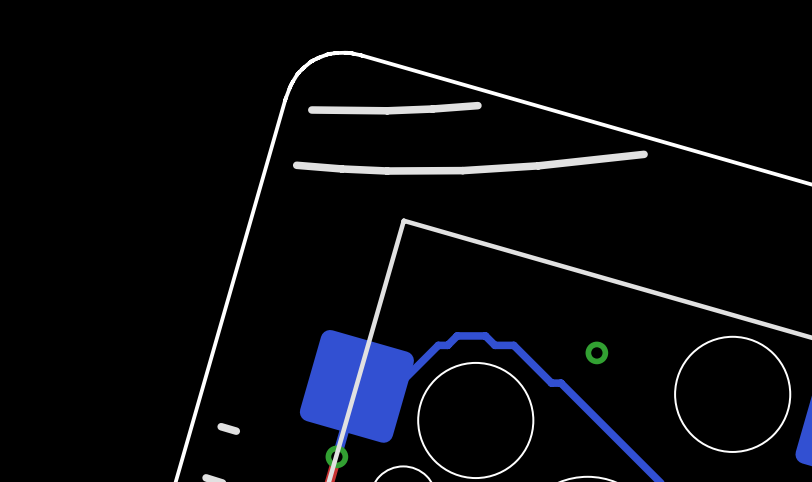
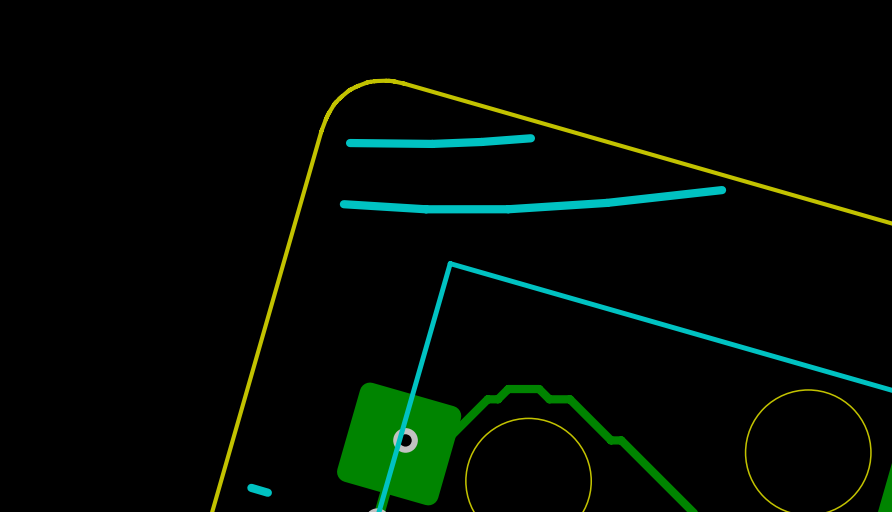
line: none -> (722, 190) (606, 202) (508, 209) (426, 209) (343, 204)
line: (644, 154) (538, 165) (462, 170) (387, 171) (296, 165) -> none
via: (596, 352) -> none
via: none -> (405, 440)

